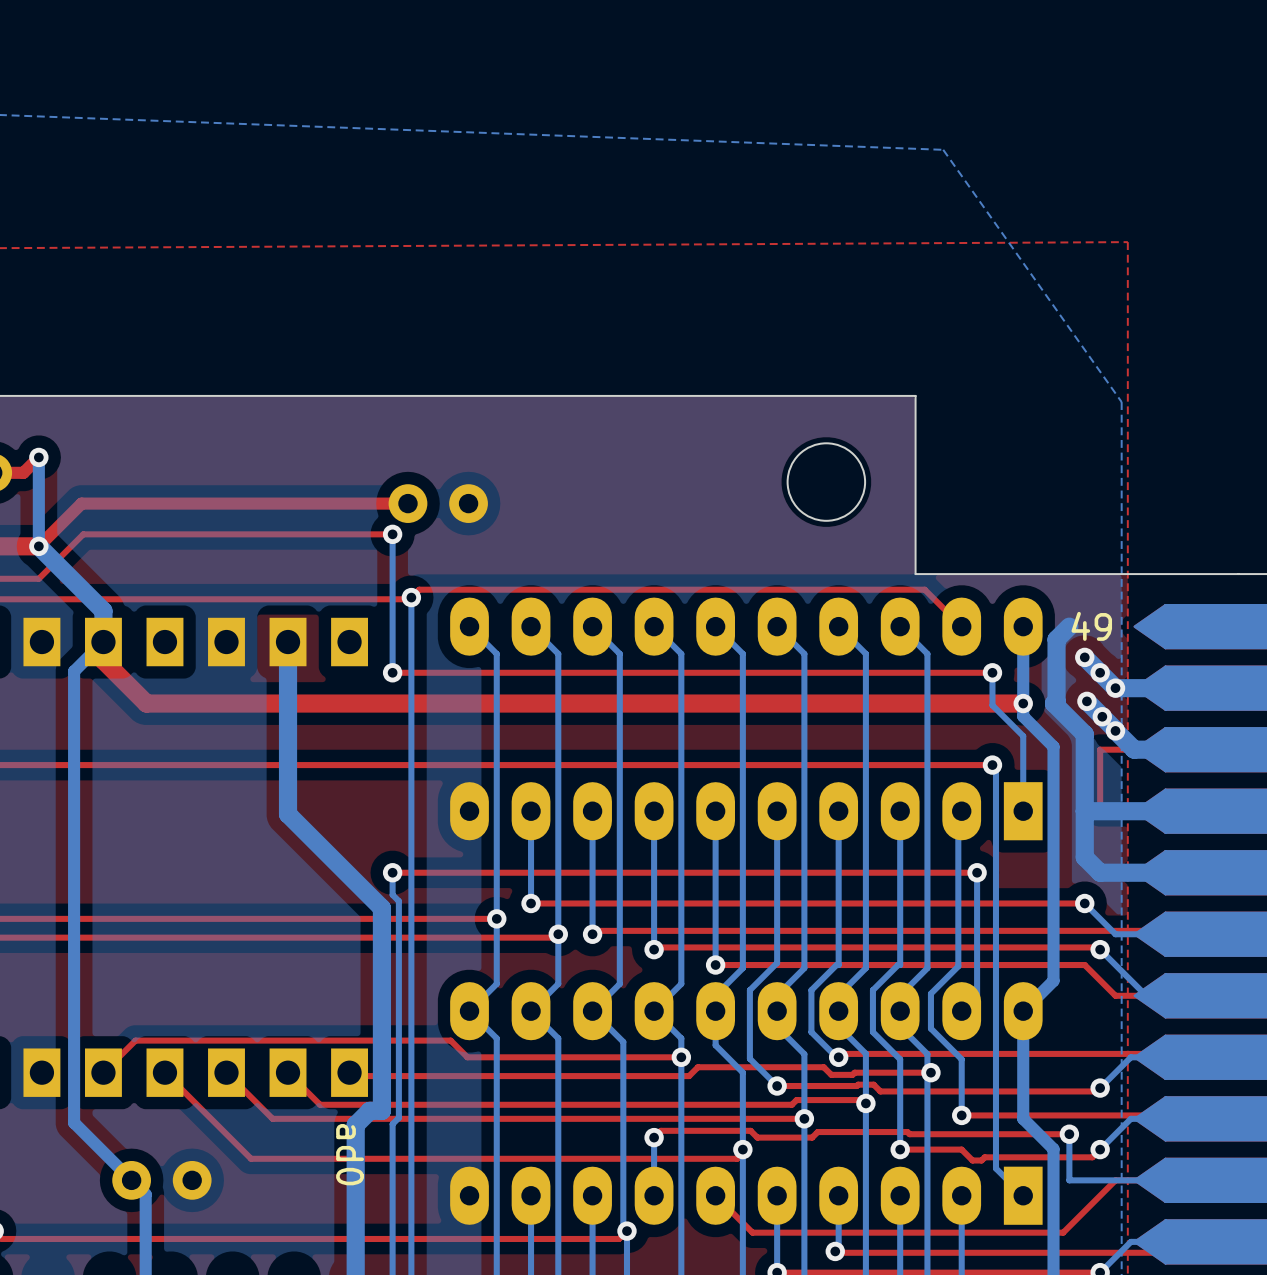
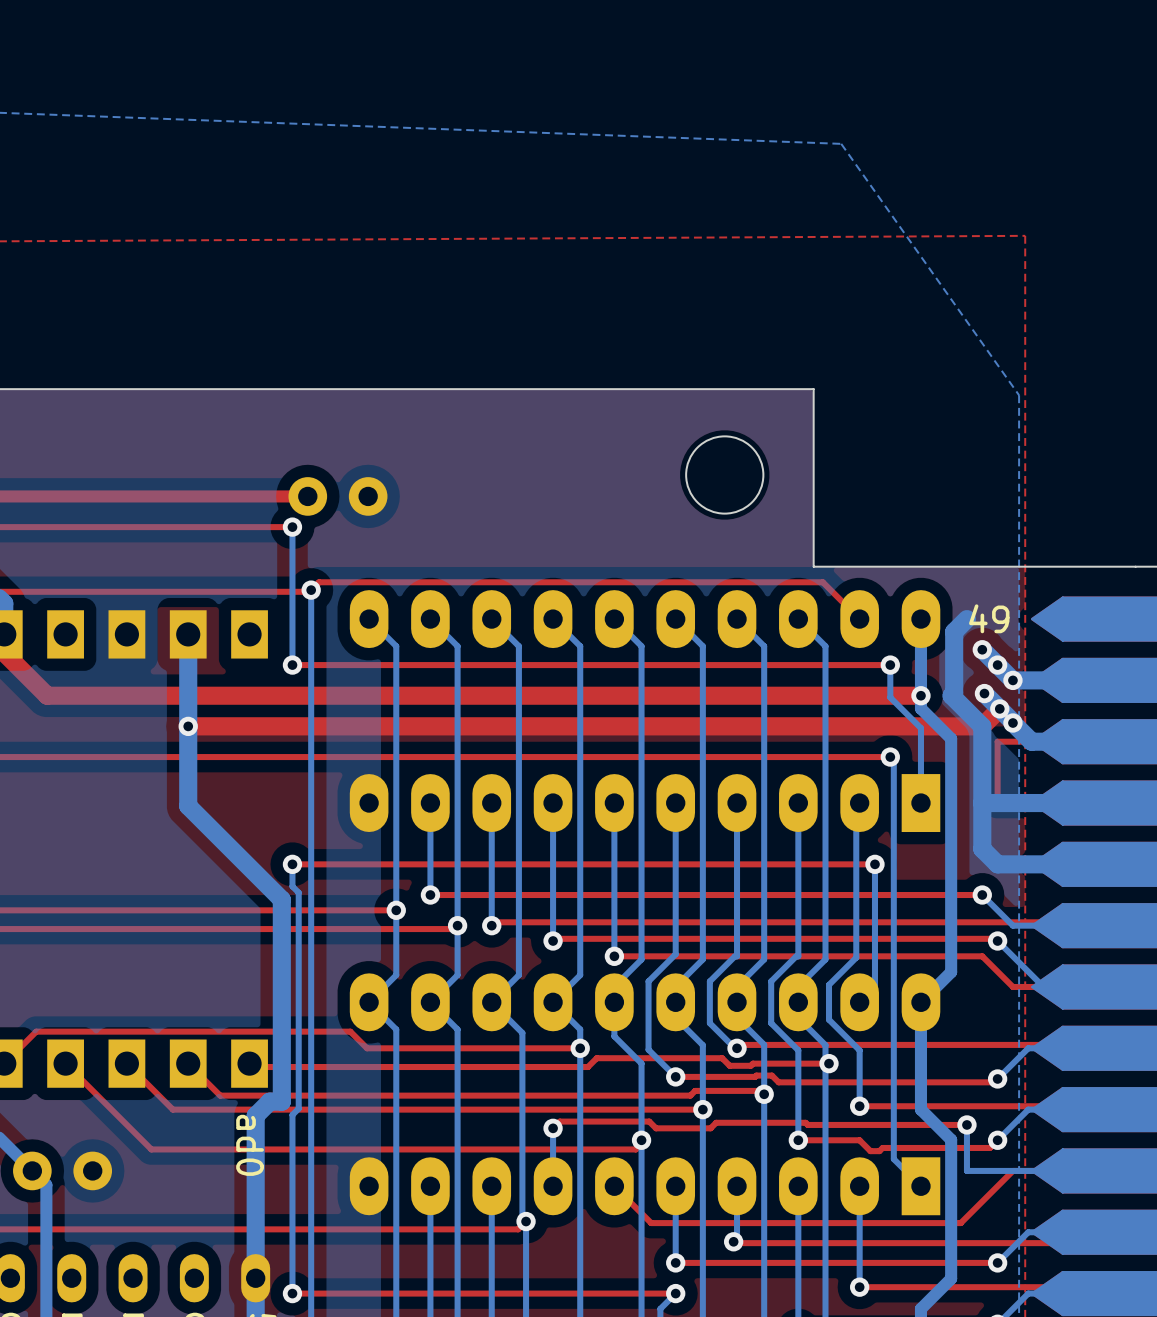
top track: none -> (999, 708) (982, 726) (188, 726)
via: none -> (188, 726)

